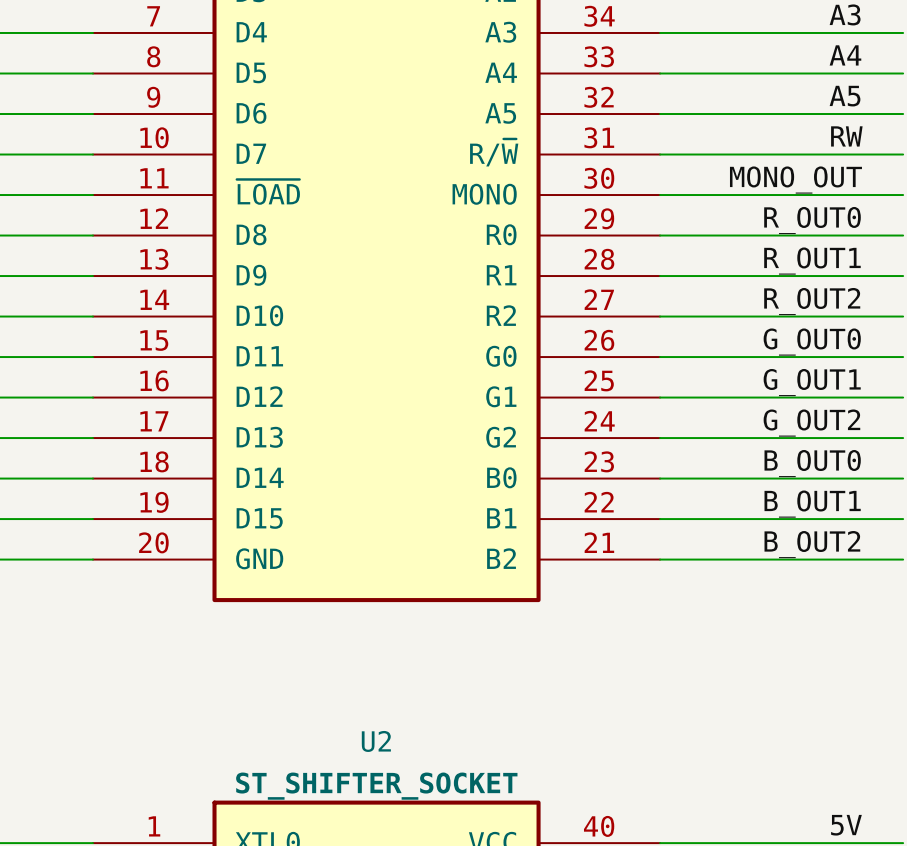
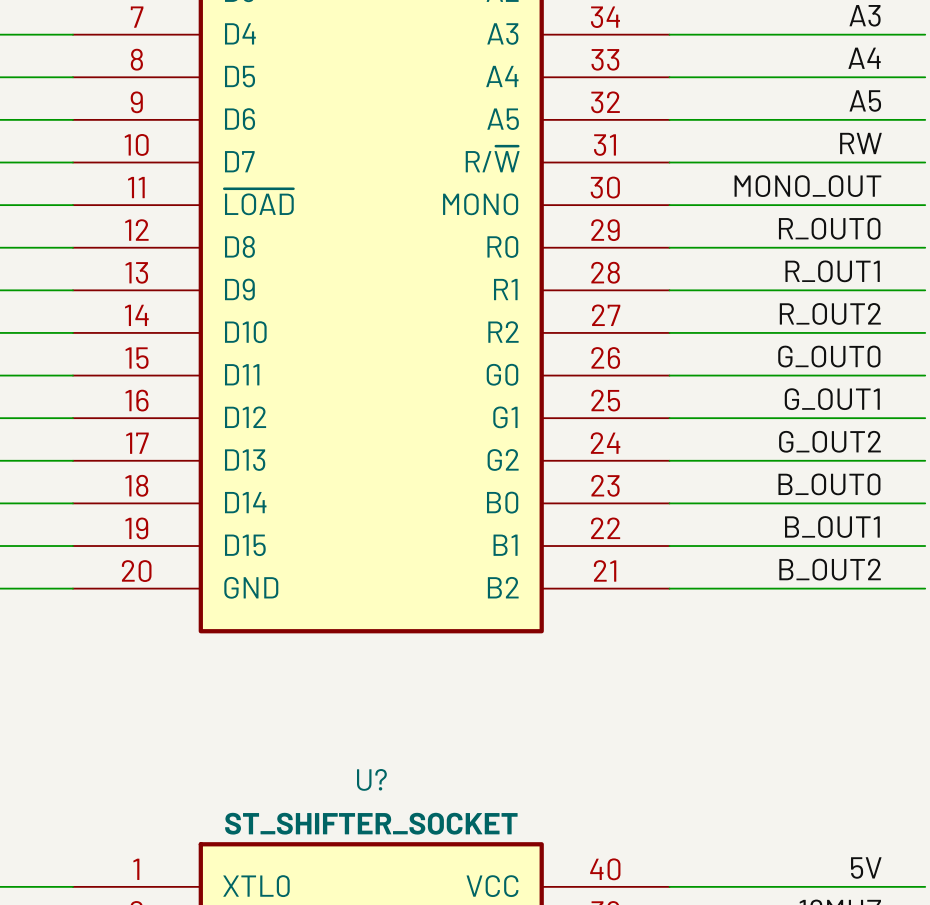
U2 name: U2 (376, 741) -> U? (371, 779)

